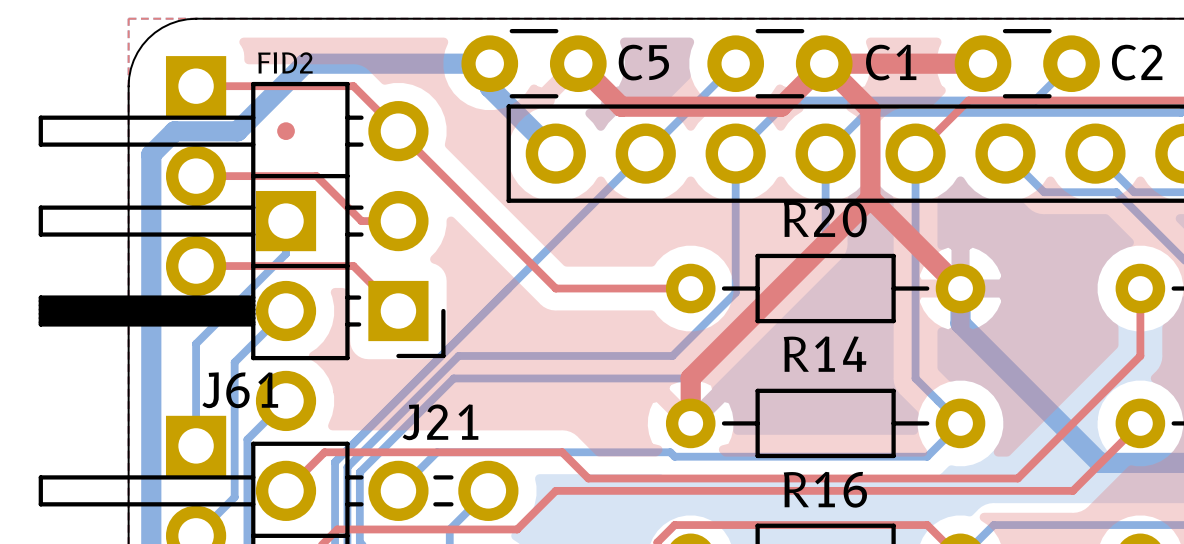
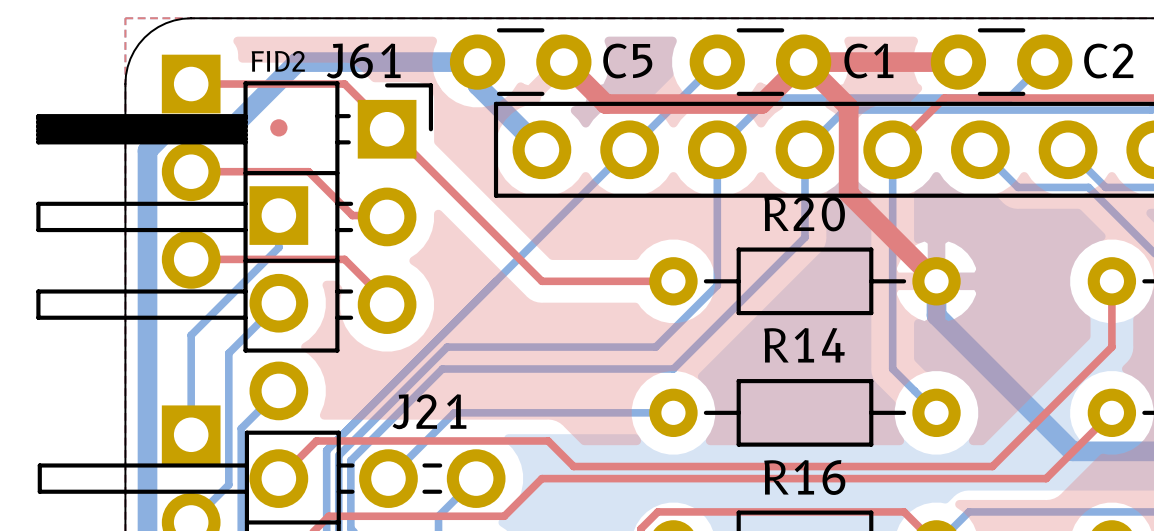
J61 footprint: [38, 81, 446, 361] -> [36, 81, 434, 353]
top track: (870, 198) (690, 378) (690, 423) -> none
J61 name position: J61 (240, 390) -> J61 (363, 61)
bottom track: (960, 423) (927, 456) (674, 456) (670, 452) (437, 452) -> (673, 412) (454, 412) (426, 440)

